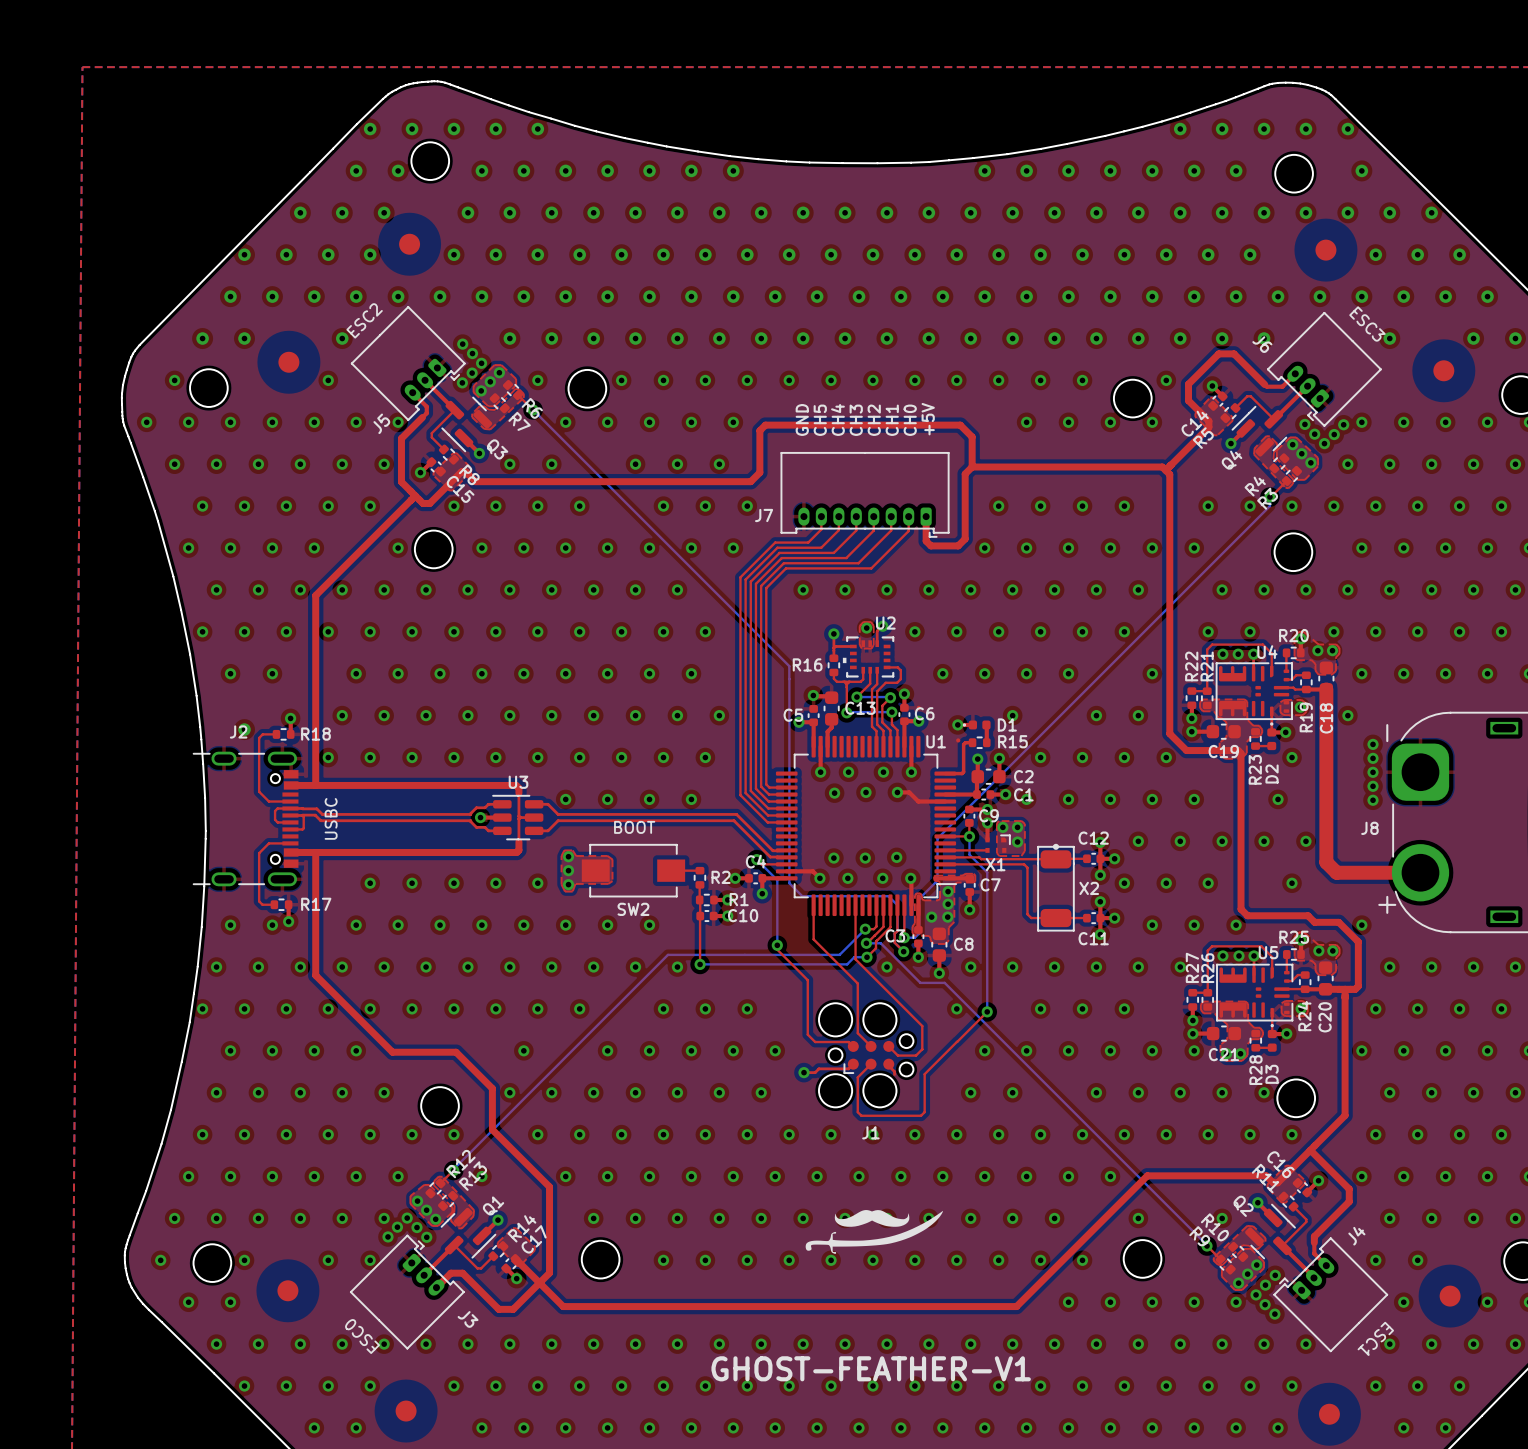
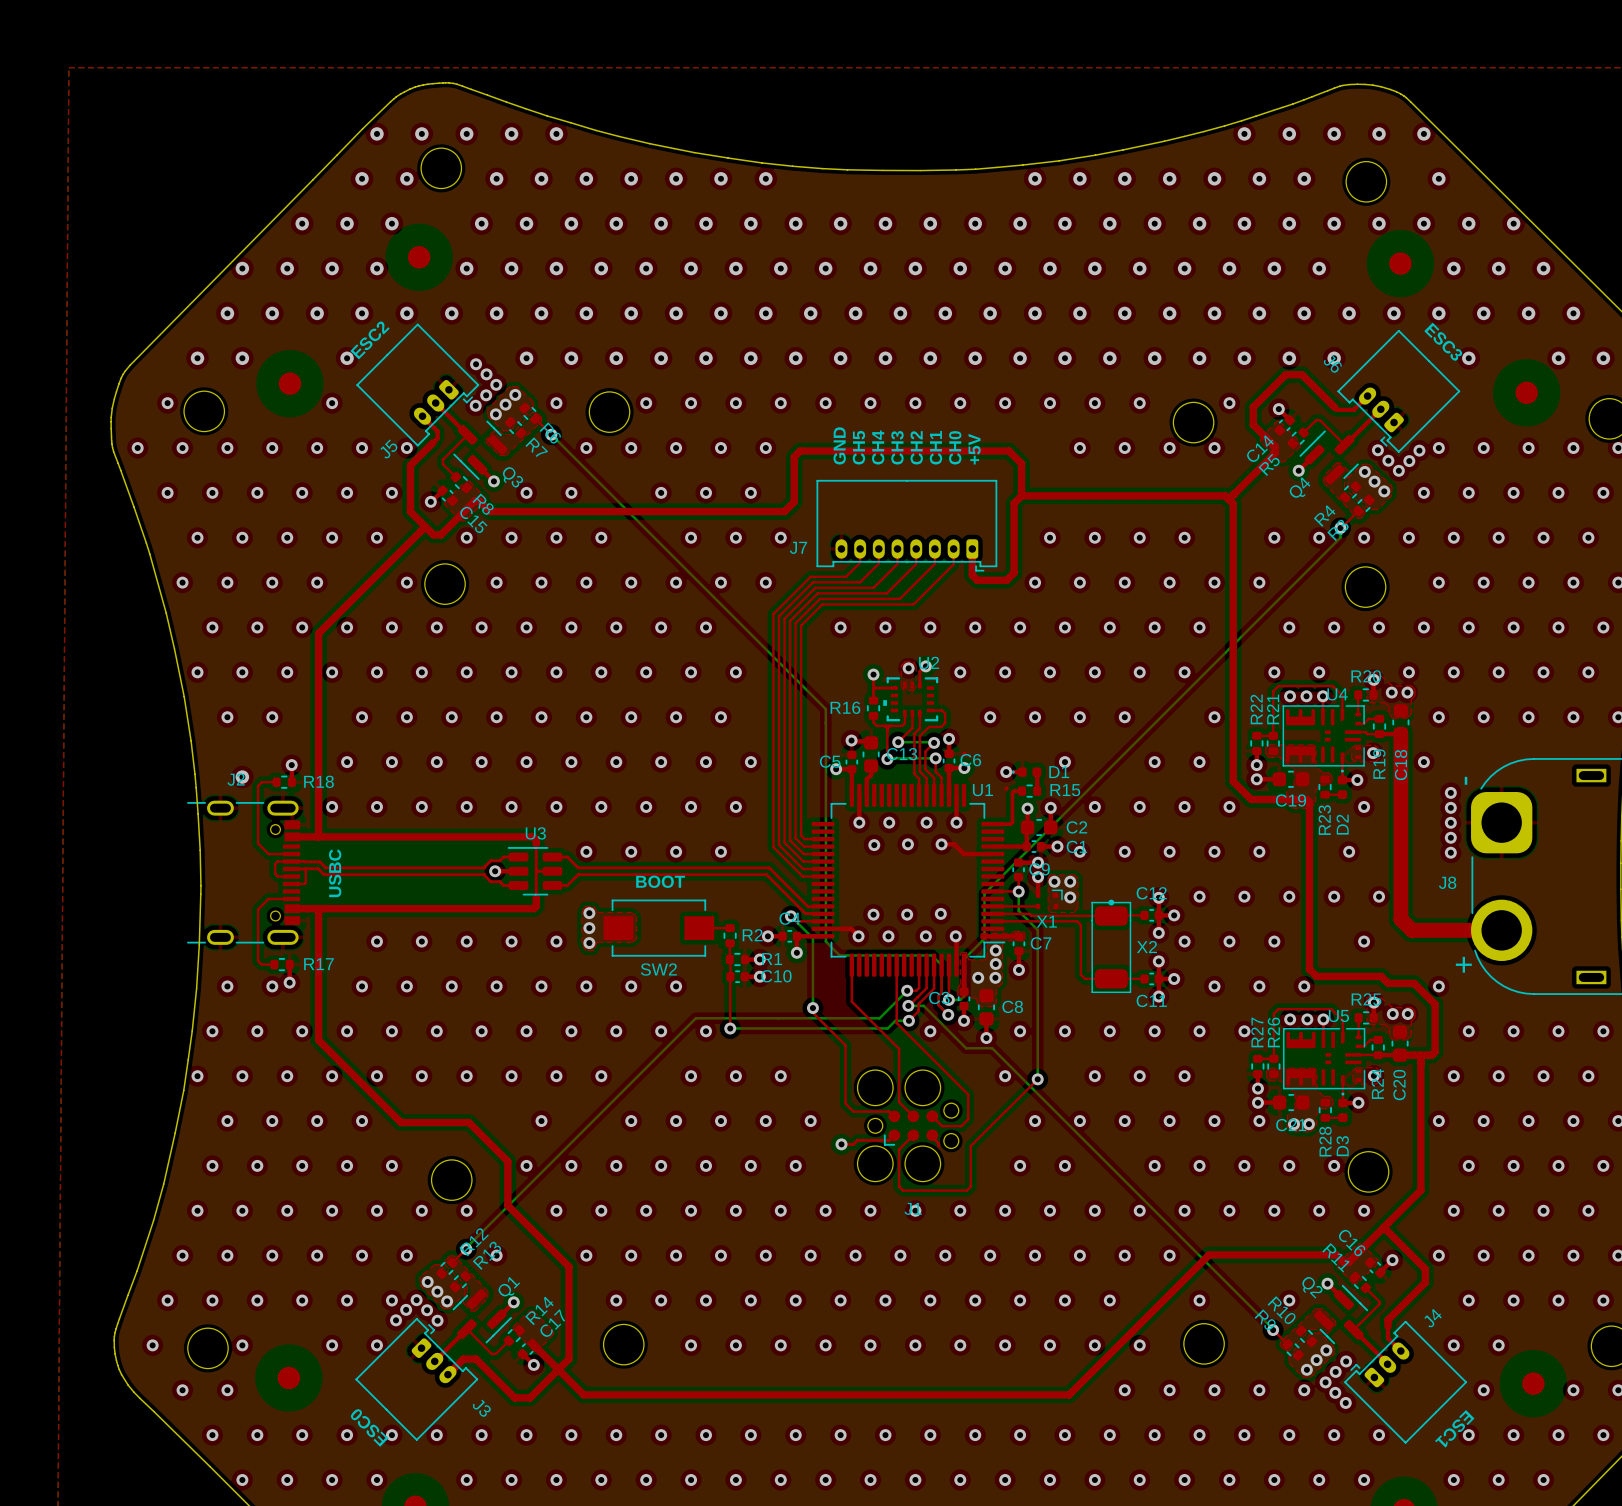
drawing: [805, 1210, 944, 1254] -> none
text: GHOST-FEATHER-V1 (871, 1368) -> none

